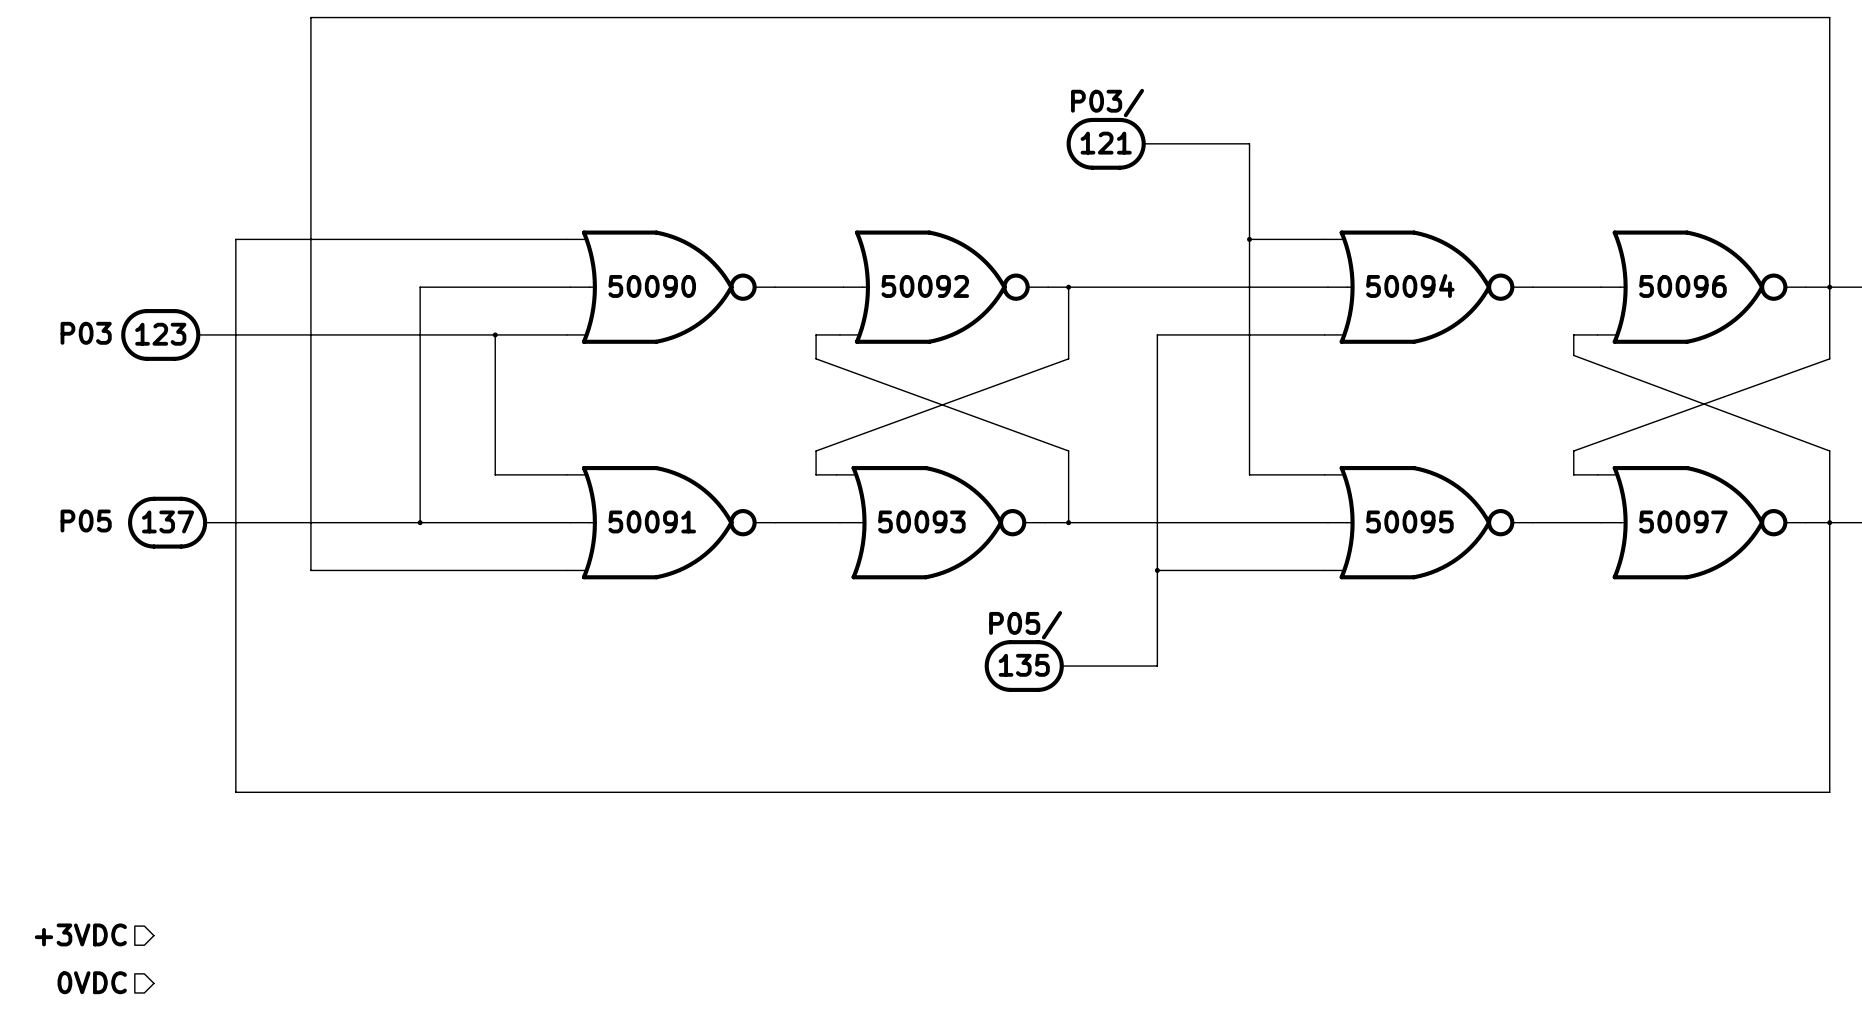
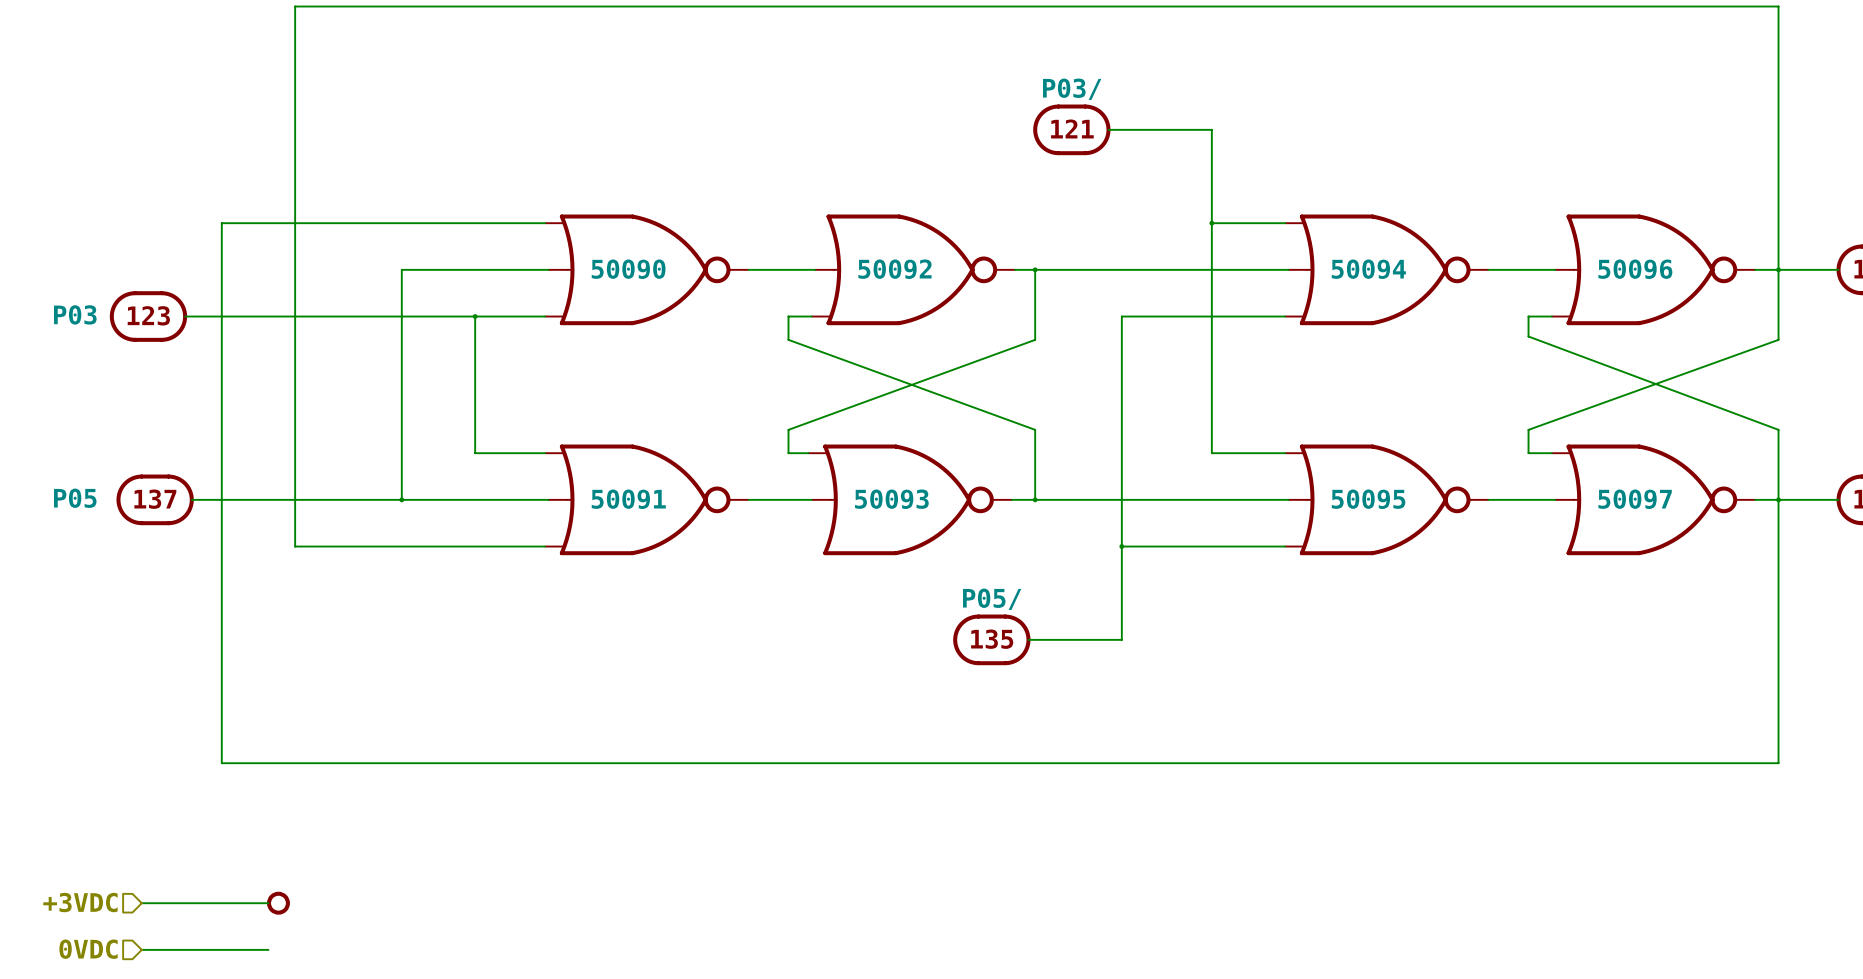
wire: none -> (141, 903) (268, 903)
part: none -> (278, 903)
wire: none -> (141, 949) (268, 949)

